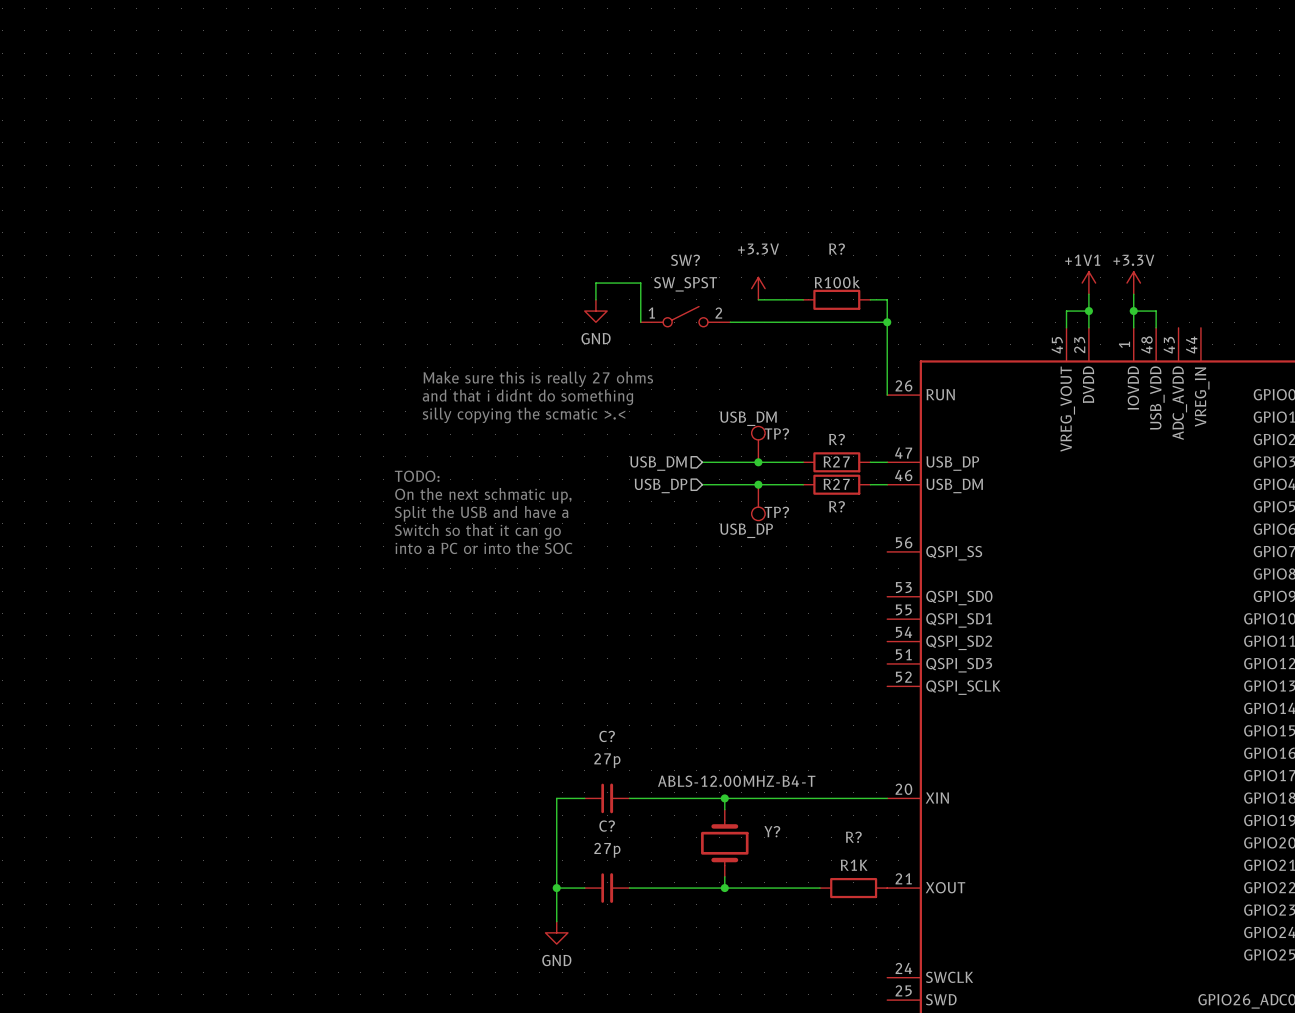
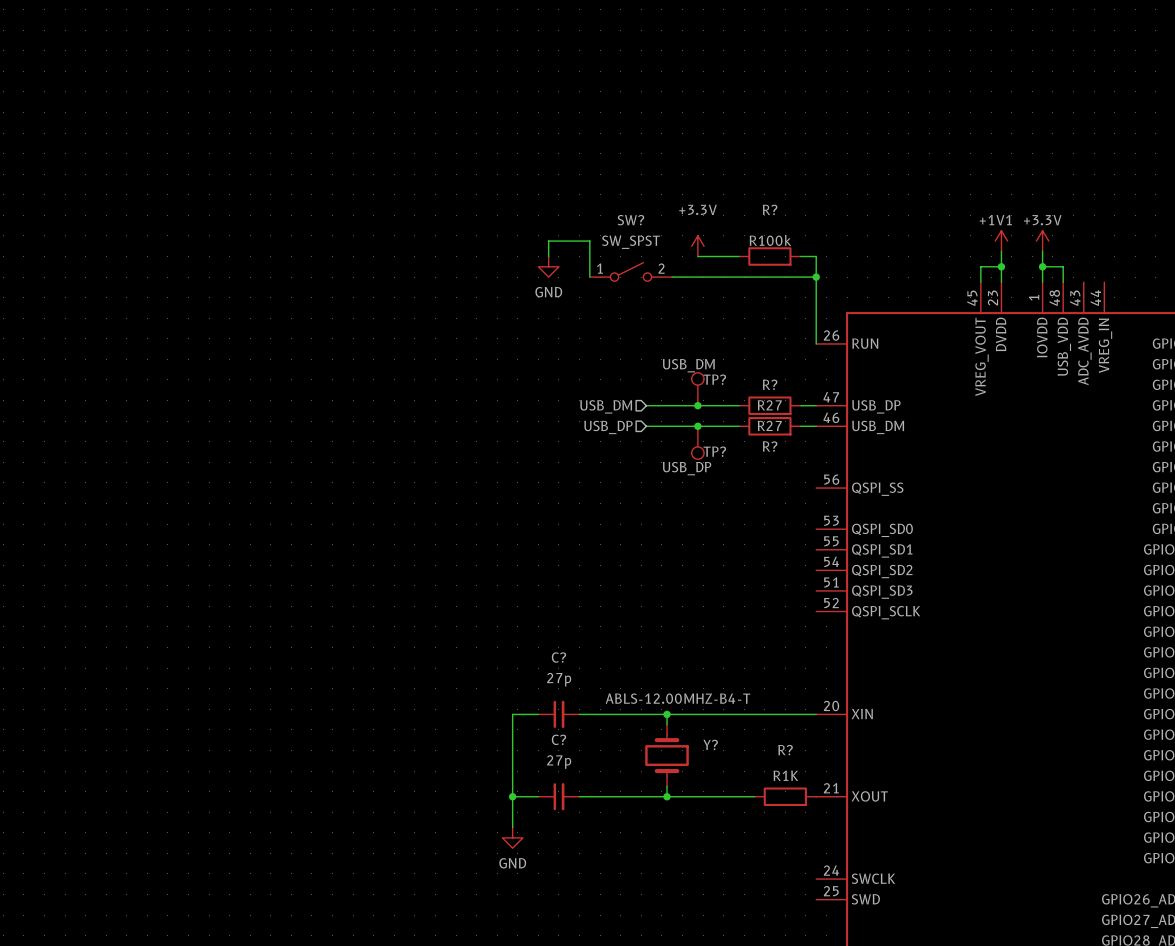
text: Make sure this is really 27 ohms (538, 379) -> none
text: and that i didnt do something (527, 397) -> none
text: silly copying the scmatic >.< (524, 415) -> none
text: TODO: (417, 476) -> none
text: On the next schmatic up, (483, 495) -> none
text: Split the USB and have a (481, 513) -> none
text: Switch so that it can go (477, 531) -> none
text: into a PC or into the SOC (484, 548) -> none

